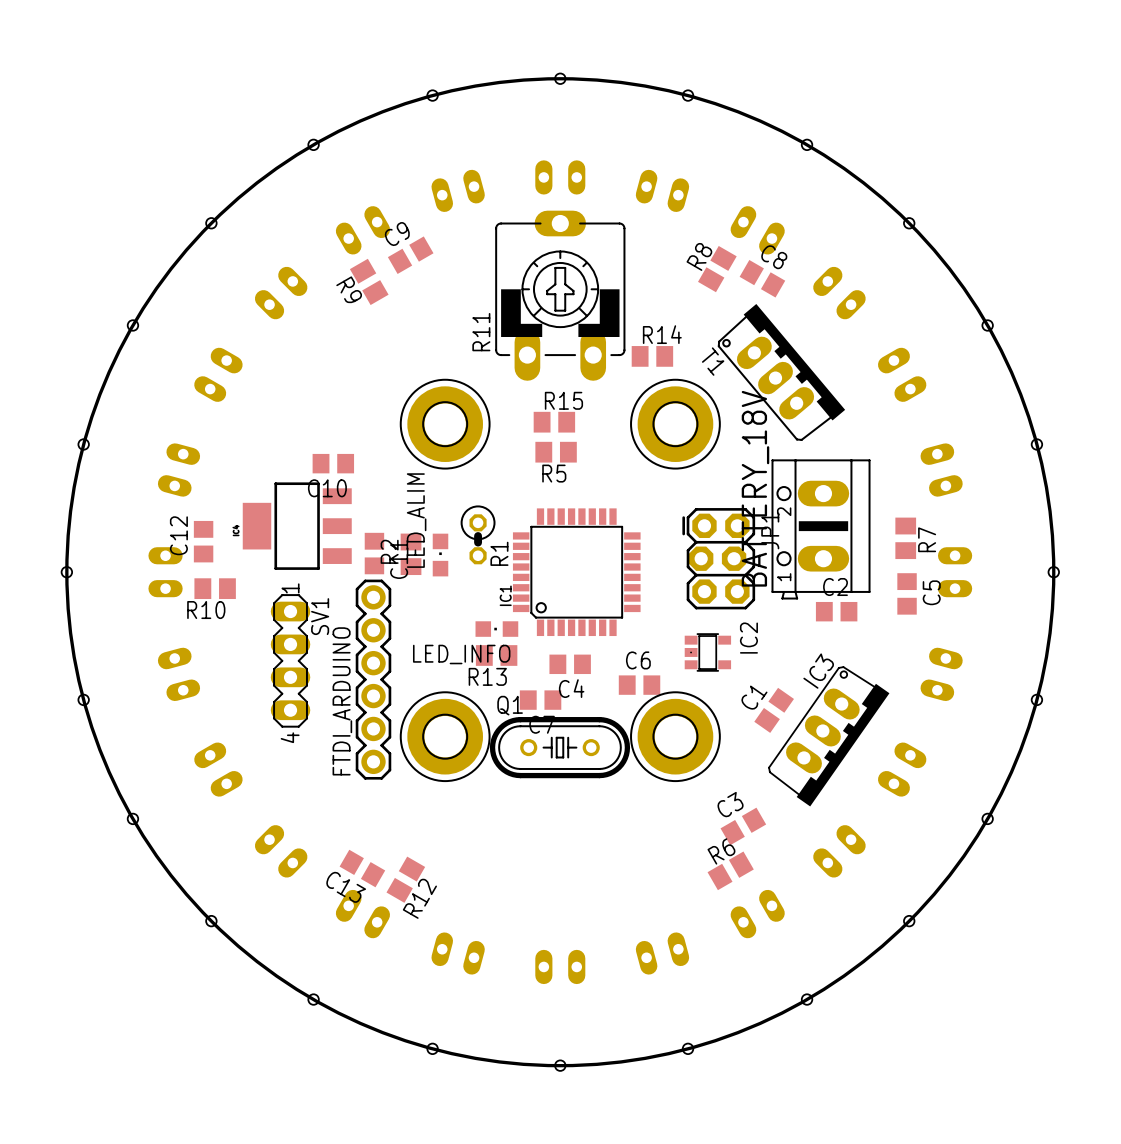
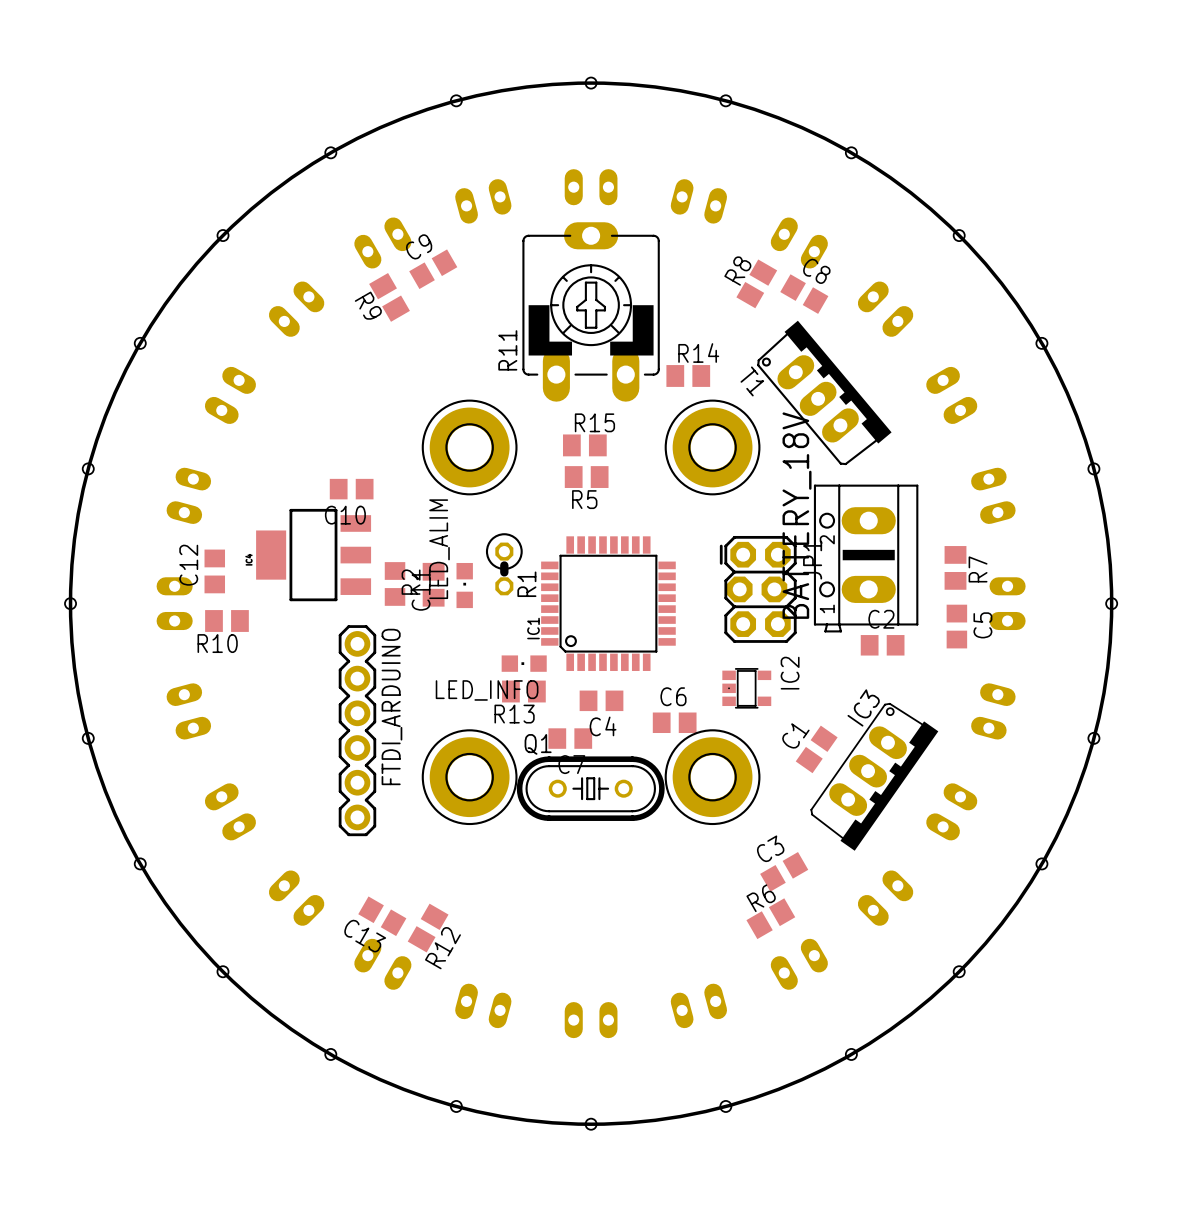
SV1: (290, 660) -> none
FTDI_ARDUINO position: (373, 679) -> (357, 730)
FTDI_ARDUINO name position: FTDI_ARDUINO (342, 701) -> FTDI_ARDUINO (391, 706)

